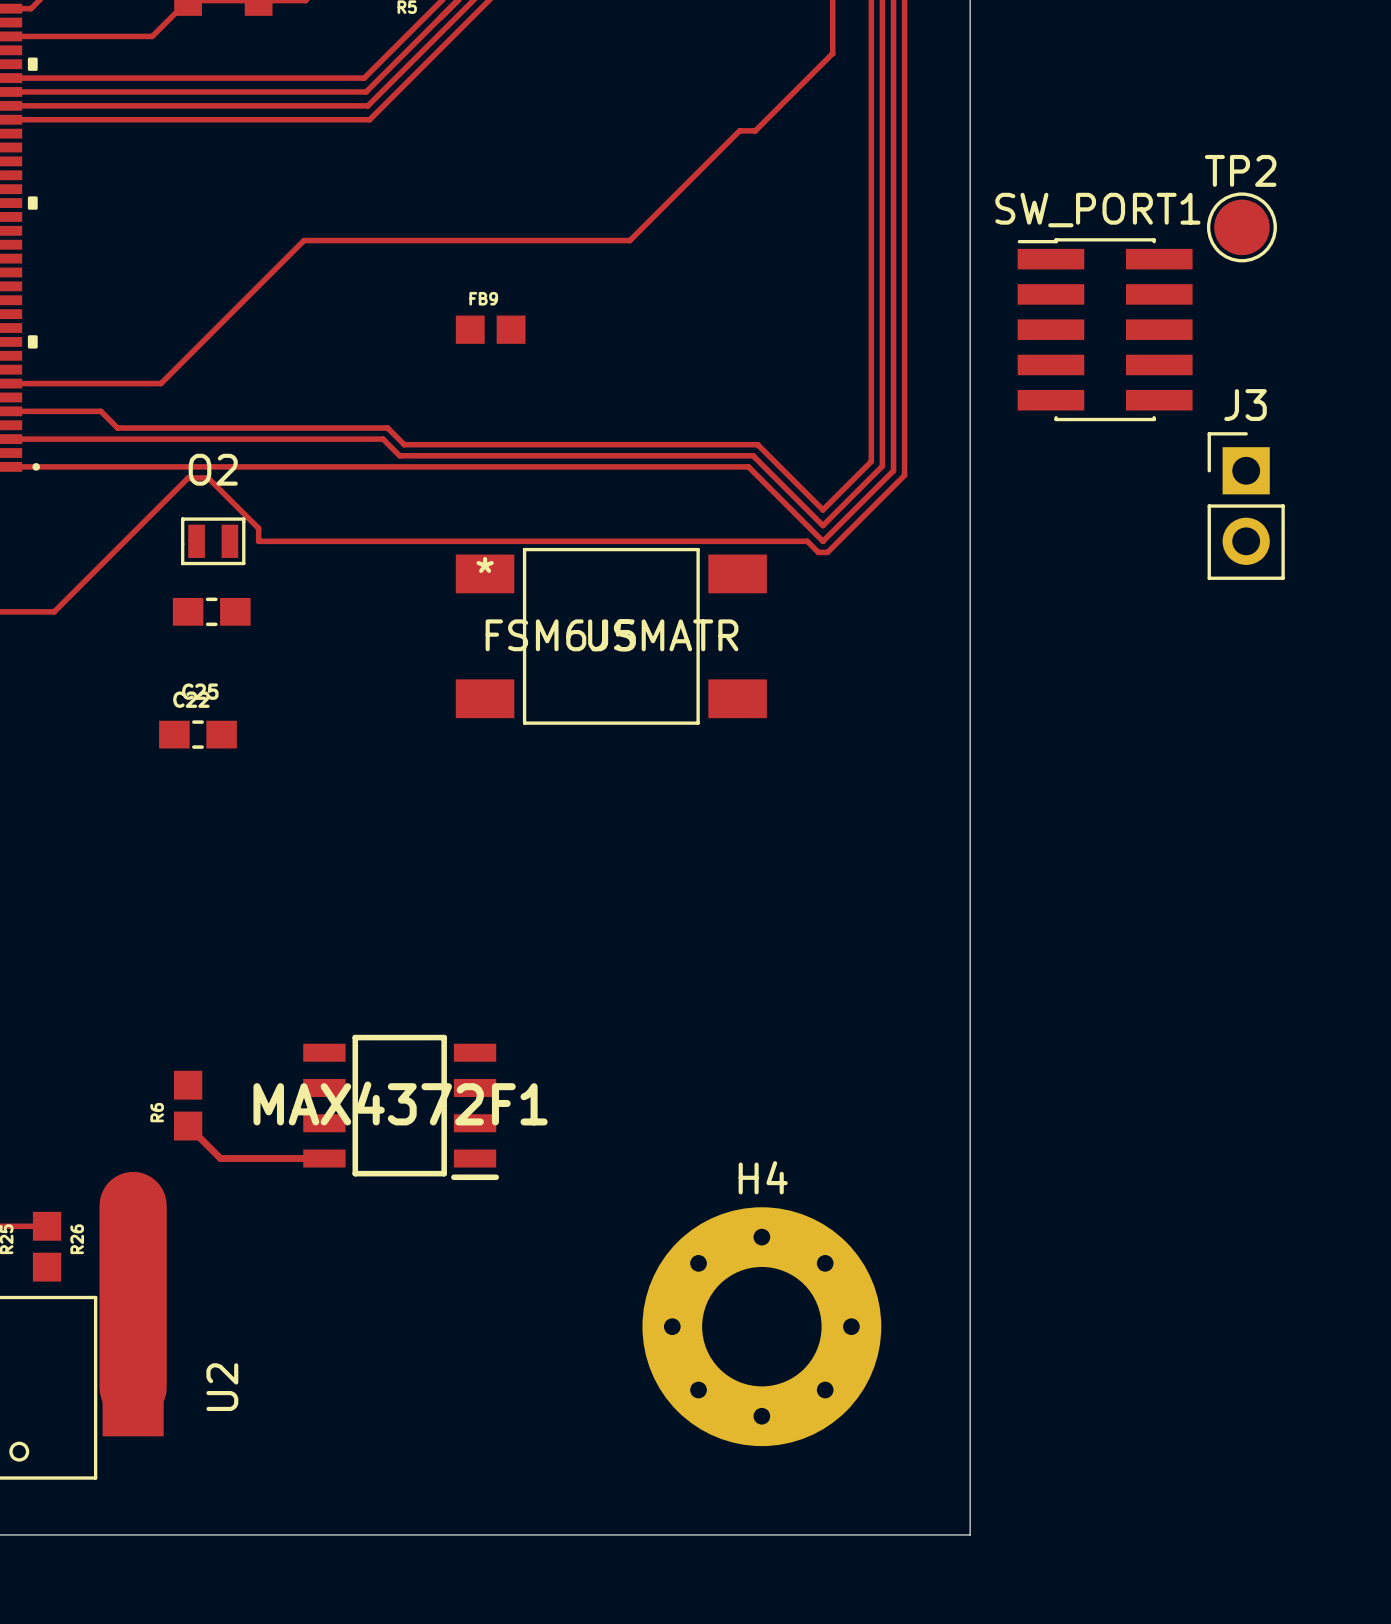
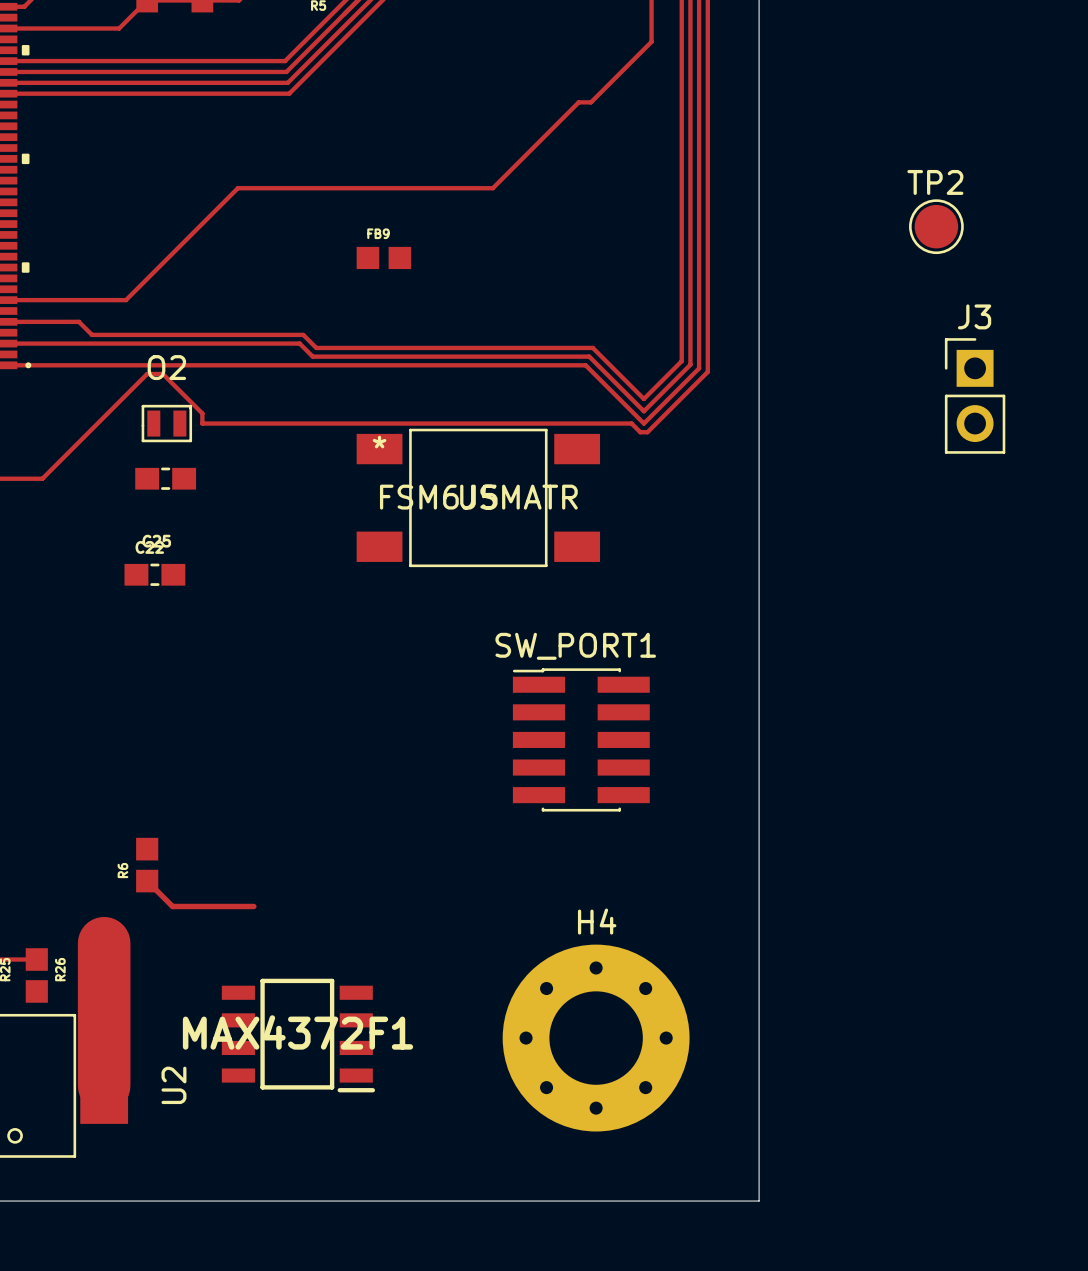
TP2 position: (1241, 227) -> (936, 226)
SW_PORT1 position: (1105, 329) -> (581, 739)
MAX4372F1 position: (401, 1107) -> (298, 1035)

